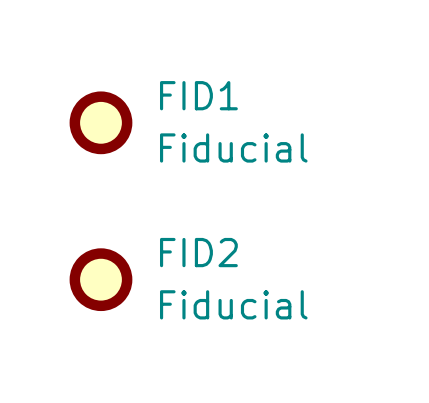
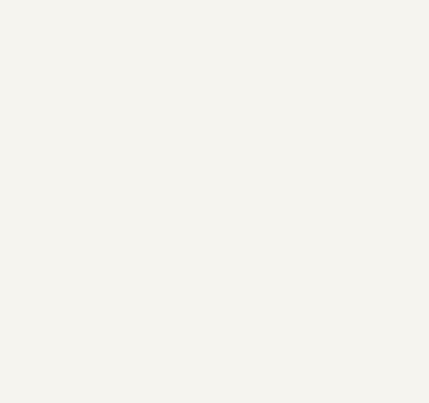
FID1: Fiducial (100, 122) -> none
FID2: Fiducial (100, 279) -> none

